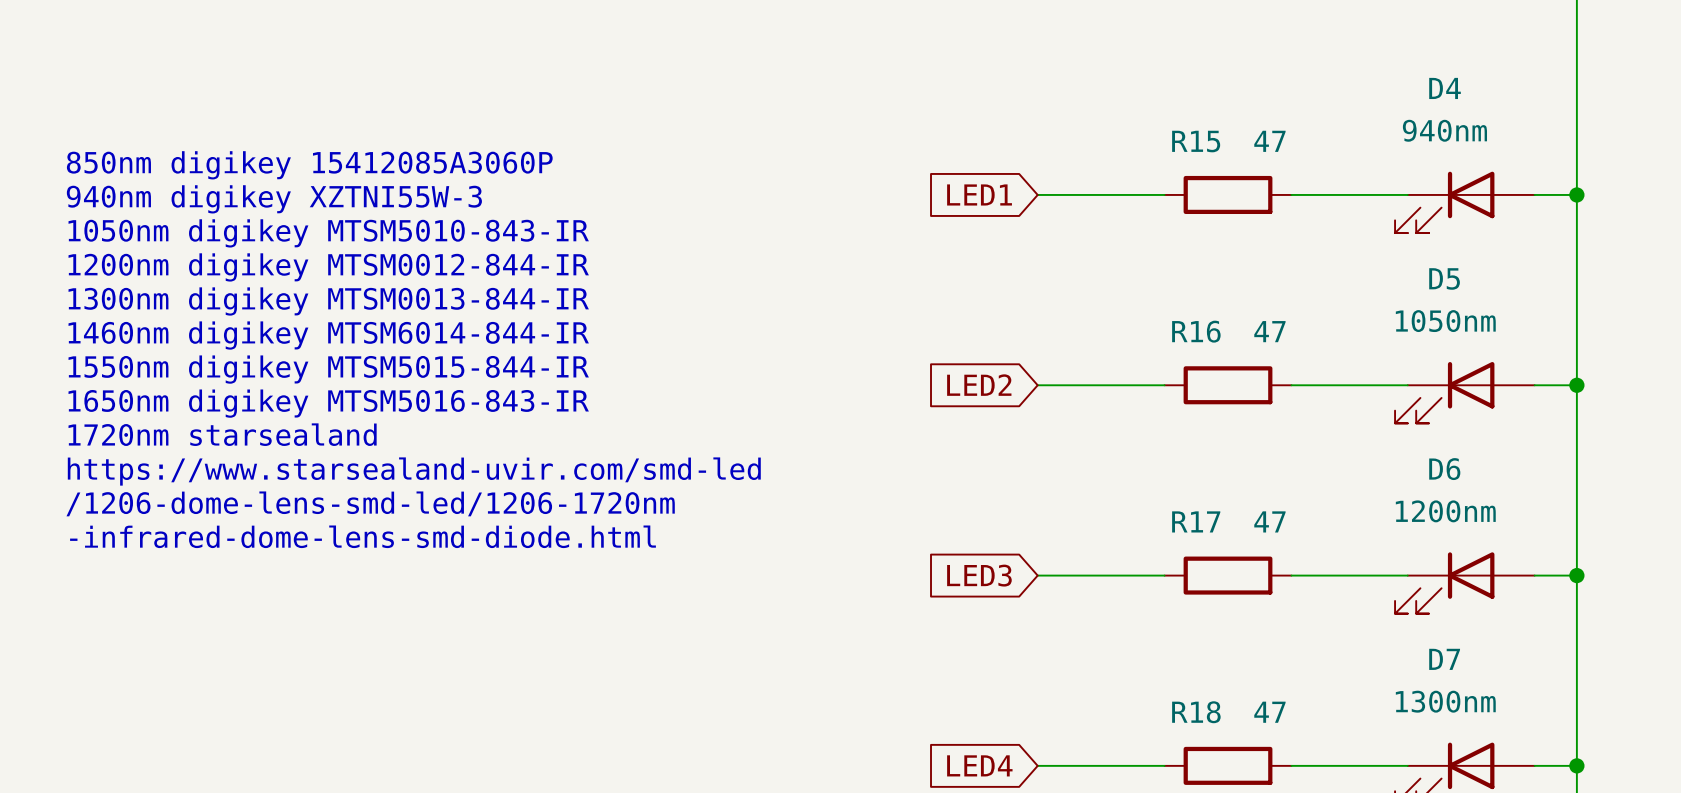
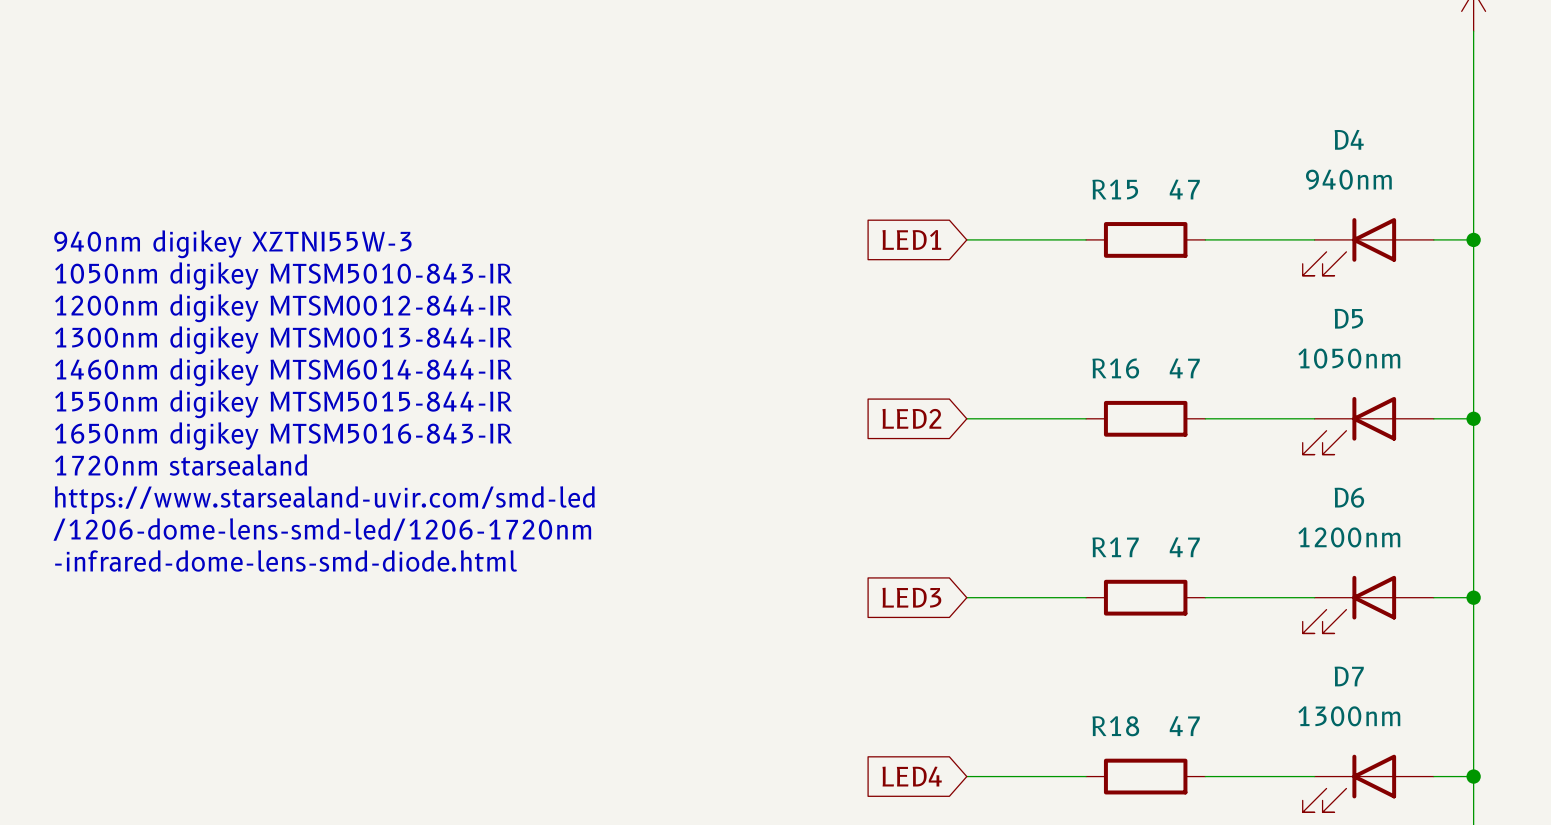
text: 850nm digikey 15412085A3060P (309, 165) -> none

